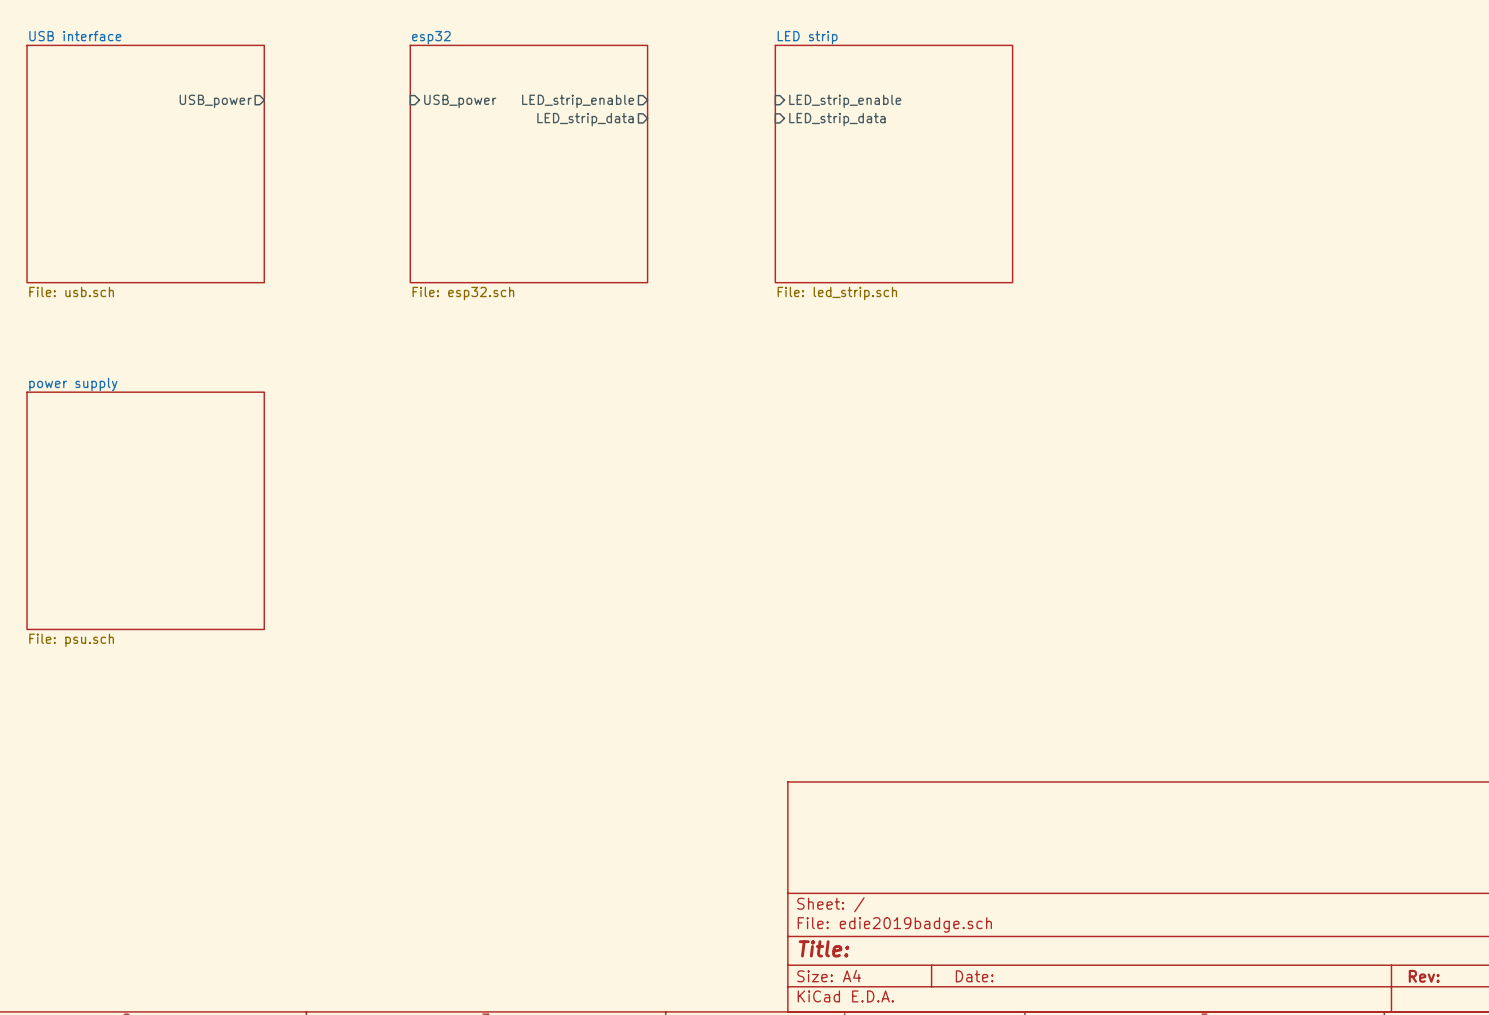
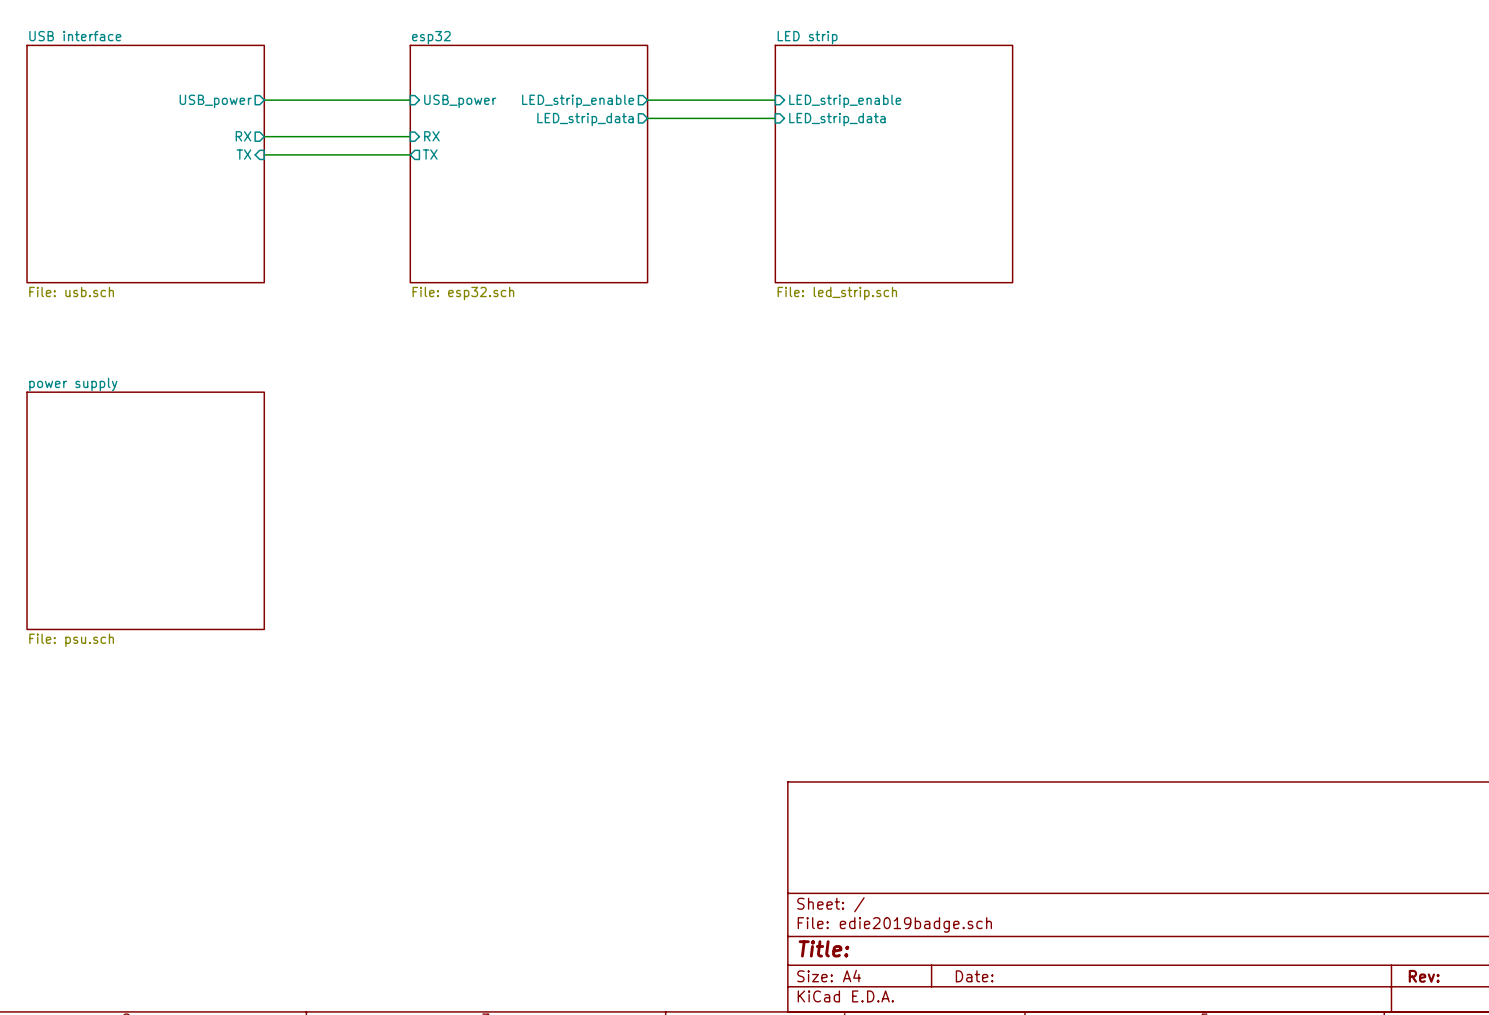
wire: none -> (264, 100) (410, 100)
wire: none -> (647, 100) (775, 100)
wire: none -> (647, 118) (775, 118)
sheet pin: none -> RX (243, 136)
wire: none -> (264, 136) (410, 136)
sheet pin: none -> RX (431, 136)
sheet pin: none -> TX (243, 154)
wire: none -> (264, 154) (410, 154)
sheet pin: none -> TX (430, 154)

